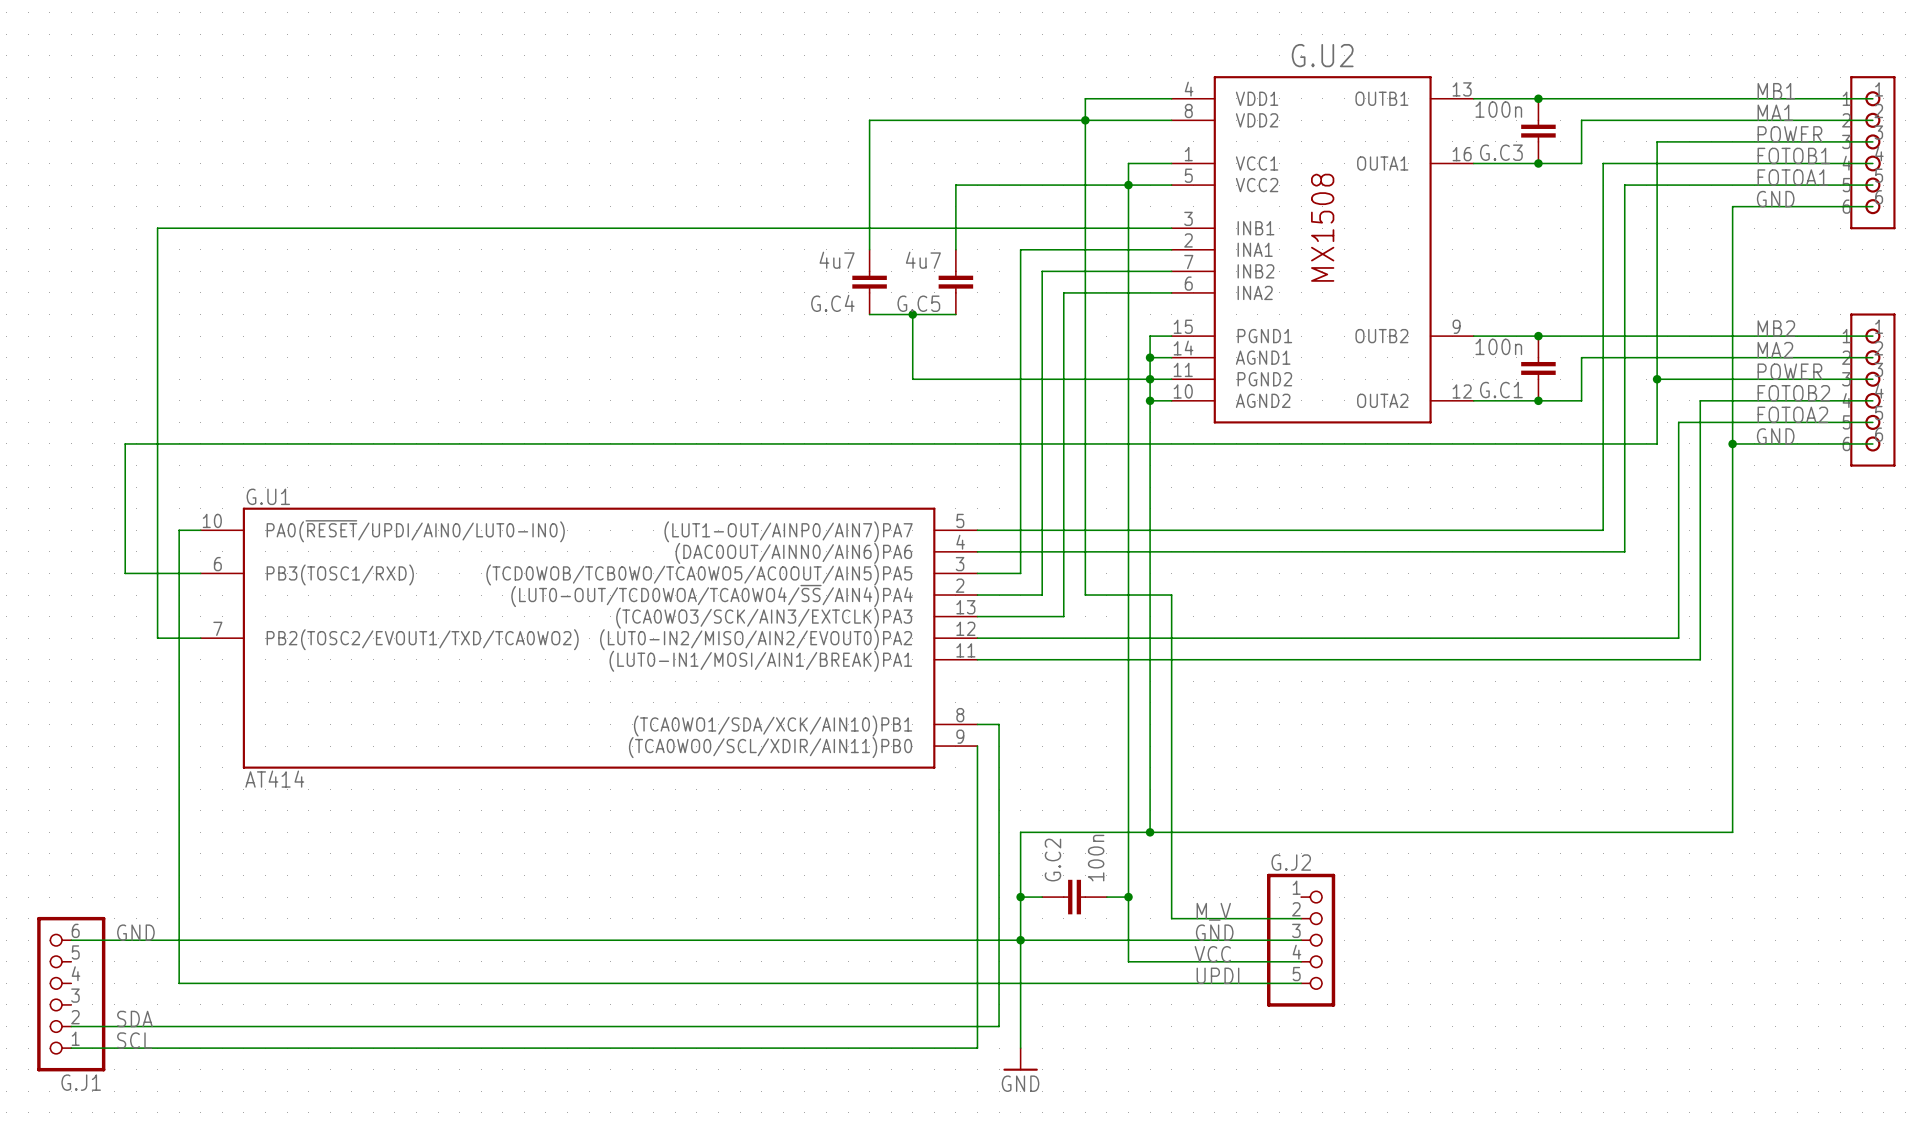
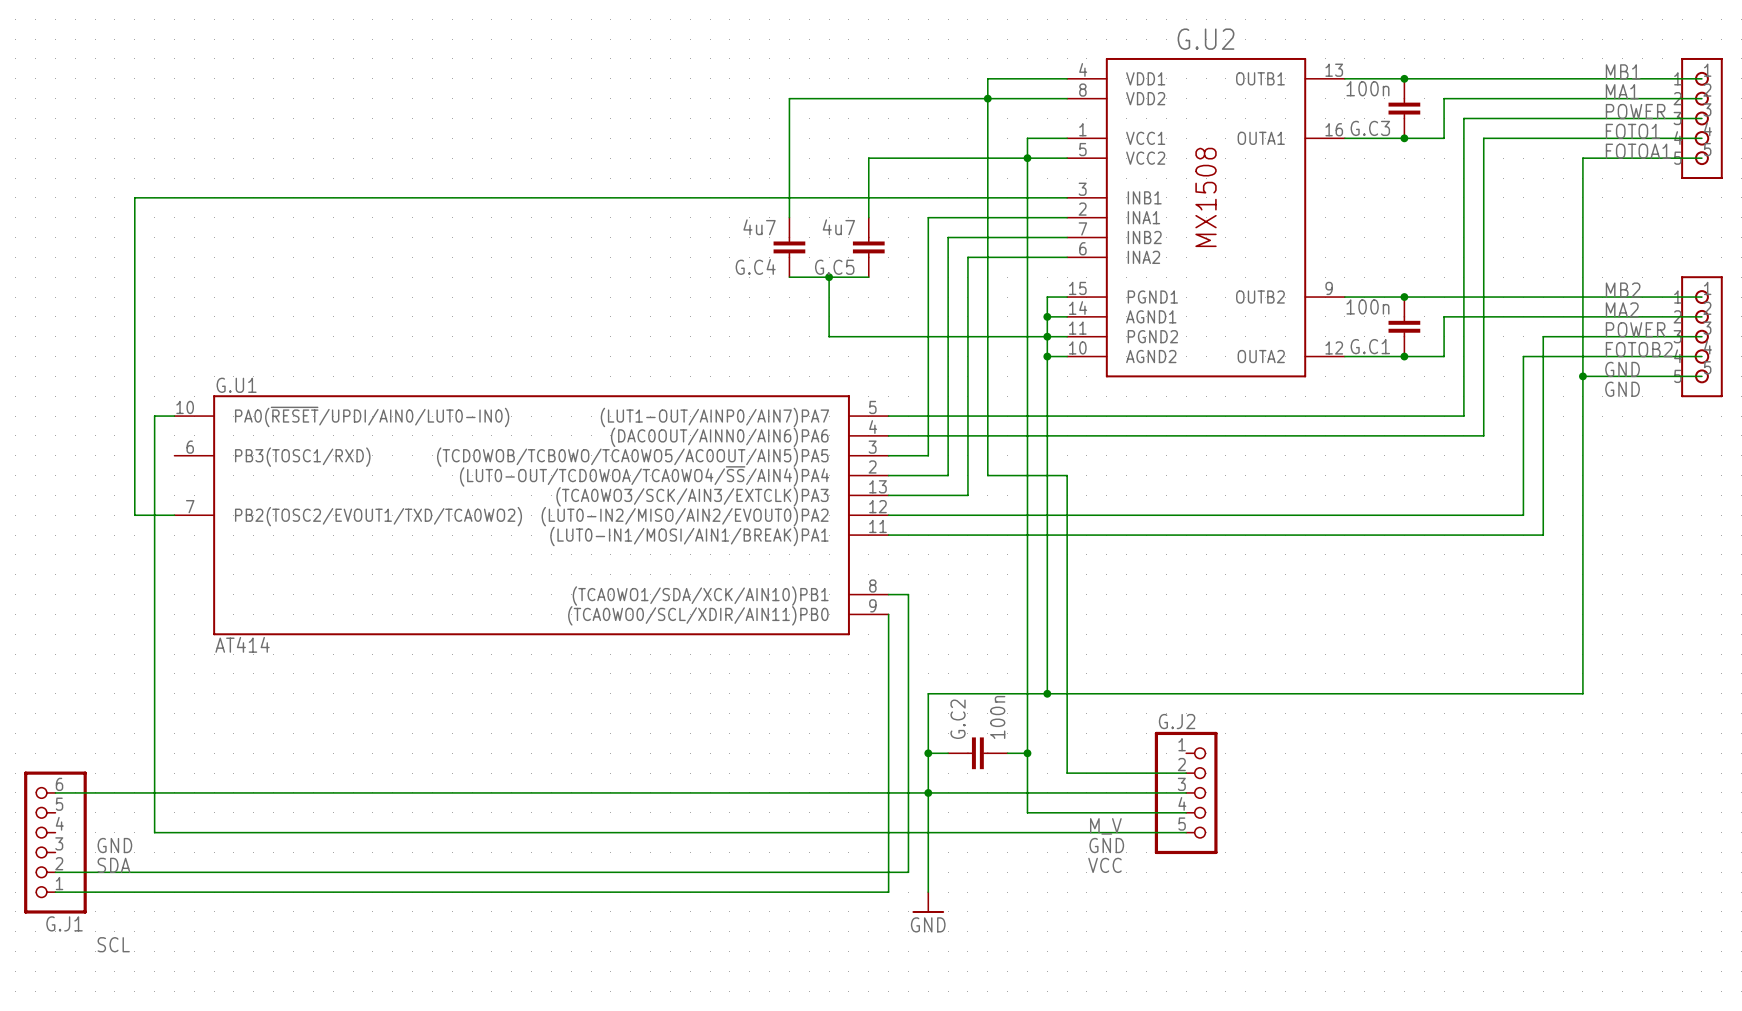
wire: (1862, 98) (1872, 98) -> none
wire: (1862, 120) (1872, 120) -> none
wire: (1657, 141) (1657, 443) (125, 443) (125, 573) (157, 573) (157, 638) (200, 638) -> (1513, 118) (1463, 118) (1463, 138)
wire: (1862, 141) (1872, 141) -> none
part: none -> (1701, 118)
part: (1872, 152) -> none
label: FOTOB1 (1793, 155) -> FOTO1 (1632, 131)
wire: (1603, 163) (1624, 163) -> (1483, 158) (1483, 138)
wire: (1862, 163) (1872, 163) -> none
wire: (1624, 185) (1732, 185) -> (1582, 178) (1582, 158)
wire: (1862, 185) (1872, 185) -> none
label: GND (1775, 199) -> none
wire: (1732, 206) (1872, 206) -> none
wire: (1862, 336) (1872, 336) -> none
wire: (1862, 357) (1872, 357) -> none
wire: (1657, 379) (1689, 379) -> none
junction: (1657, 379) -> none
wire: (1862, 379) (1872, 379) -> none
part: none -> (1701, 336)
part: (1872, 390) -> none
wire: (1700, 400) (1700, 659) (999, 659) -> (1553, 356) (1523, 356) (1523, 515) (928, 515)
wire: (1862, 400) (1872, 400) -> none
label: FOTOA2 (1792, 414) -> GND (1622, 369)
wire: (1732, 422) (1678, 422) (1678, 638) (977, 638) -> none
wire: (1862, 422) (1872, 422) -> none
wire: (1732, 443) (1872, 443) -> none
junction position: (1732, 443) -> (1582, 376)
wire: none -> (888, 416) (1463, 416)
wire: (1603, 465) (1603, 530) (1171, 530) -> (1543, 336) (1543, 535) (1067, 535) (1067, 475)
wire: (1624, 487) (1624, 551) (1063, 551) (1063, 616) (977, 616) -> (1483, 435) (888, 435)
wire: (1020, 508) (1020, 573) -> (928, 455) (888, 455)
wire: (179, 530) (200, 530) -> (154, 475) (154, 416) (174, 416)
wire: (1042, 595) (1042, 530) (1085, 530) (1085, 595) -> (948, 535) (987, 535)
G.U1 position: (589, 638) -> (531, 515)
wire: (977, 724) (999, 724) -> (908, 594) (908, 654)
wire: (1150, 767) (1150, 832) -> (888, 614) (888, 673)
junction: none -> (1047, 693)
wire: (1732, 767) (1732, 832) (1128, 832) -> (1582, 693) (928, 693) (928, 753)
junction: none -> (928, 753)
junction position: (1150, 832) -> (1027, 753)
wire: (1171, 853) (1171, 918) -> (1067, 773) (1186, 773)
wire: (1020, 897) (1042, 897) -> none
junction position: (1020, 897) -> (928, 792)
G.C2 position: (1074, 897) -> (977, 753)
wire: (1106, 897) (1128, 897) (1128, 961) (1301, 961) -> none
wire: none -> (1027, 812) (1186, 812)
junction: (1128, 897) -> none
wire: (179, 918) (179, 983) -> (55, 892) (154, 892)
wire: none -> (154, 832) (1067, 832)
wire: (71, 940) (1301, 940) -> (55, 792) (1186, 792)
junction: (1020, 940) -> none
G.J2 position: (1301, 940) -> (1186, 792)
wire: (999, 961) (999, 1026) (71, 1026) -> (908, 872) (55, 872)
label: UPDI (1217, 975) -> none
wire: (1020, 983) (1020, 1048) -> none
wire: (1301, 983) (977, 983) (977, 1048) (71, 1048) -> none
G.J1 position: (71, 994) -> (55, 842)
label position: SDA (134, 1018) -> SDA (114, 865)
power symbol position: GND (1020, 1059) -> GND (928, 902)

